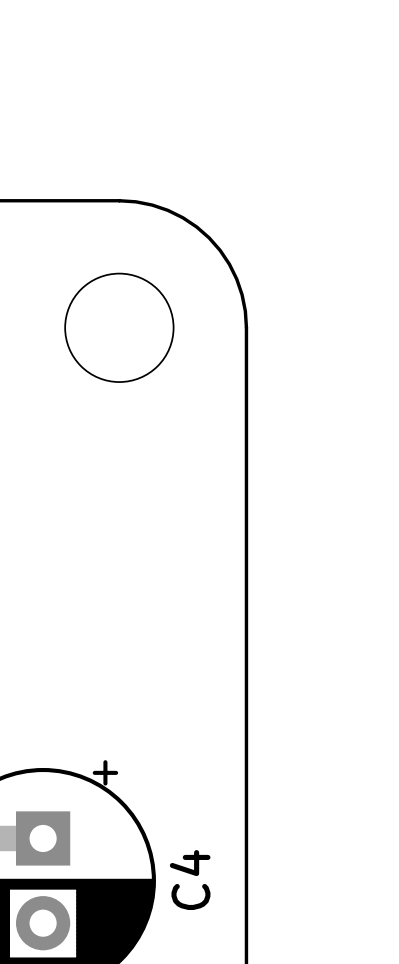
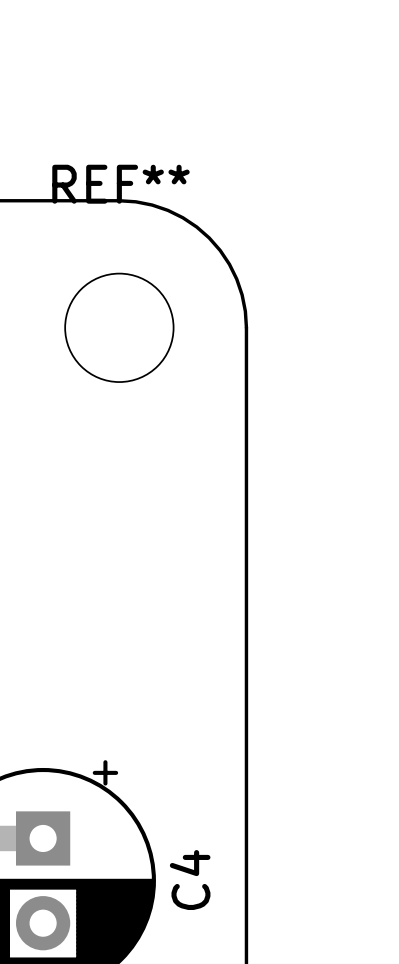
REF** name: none -> REF** (120, 184)

